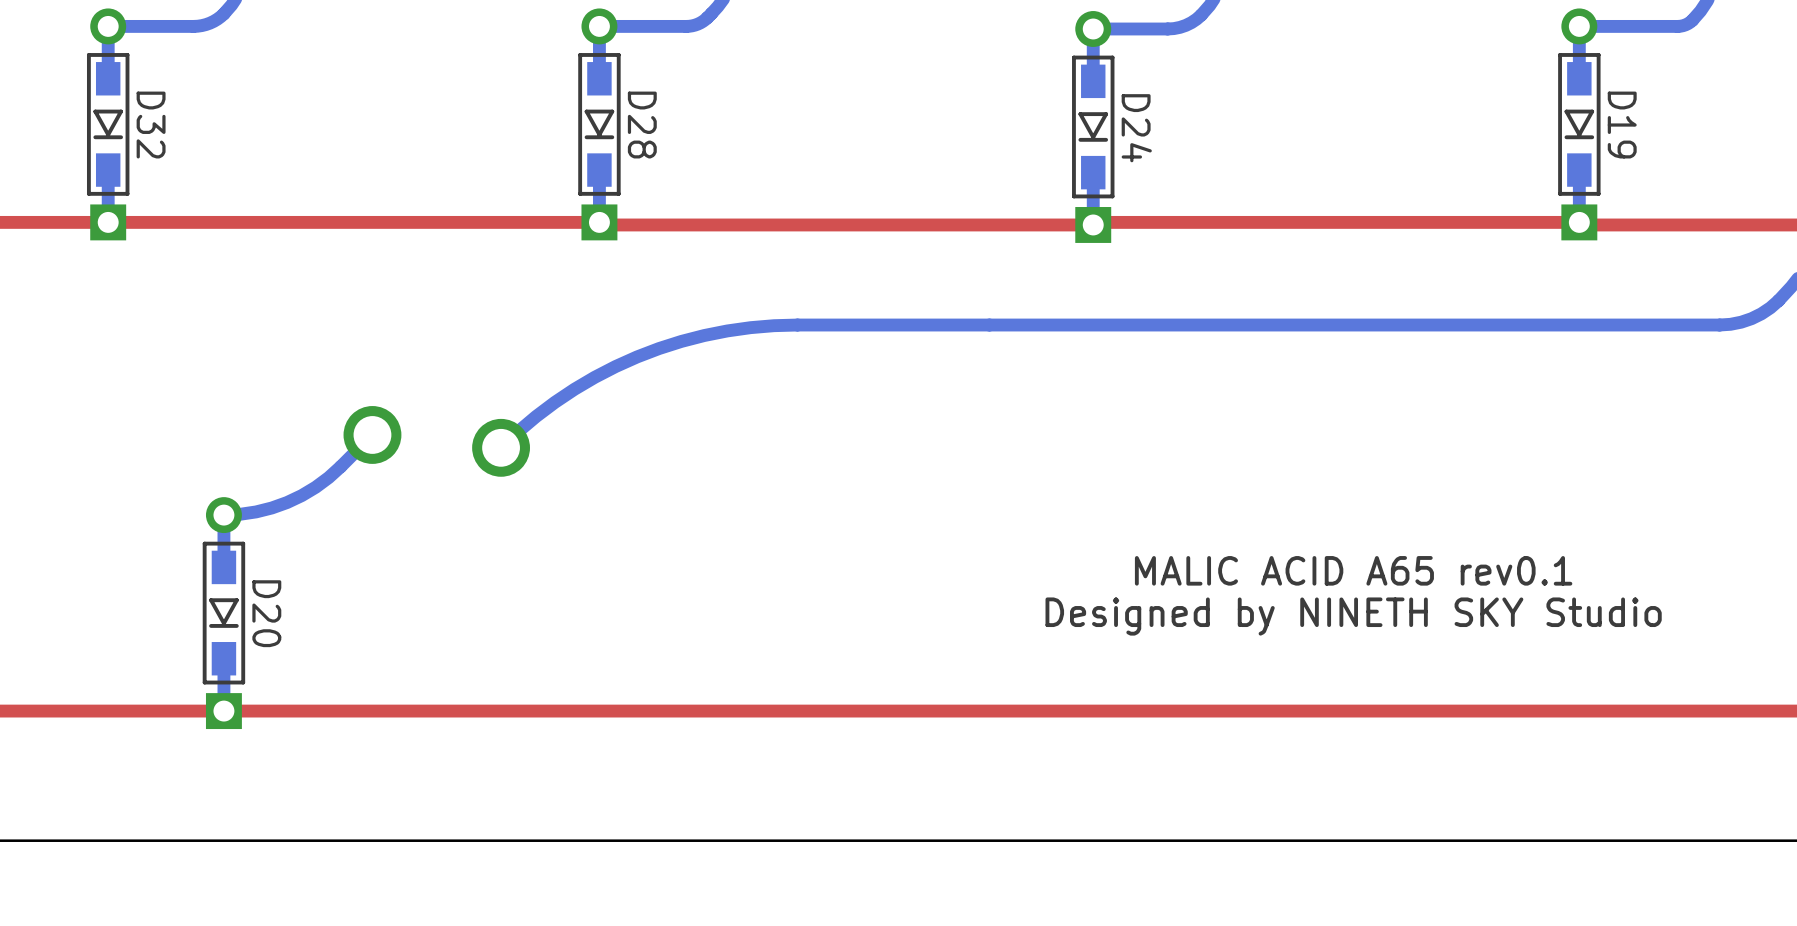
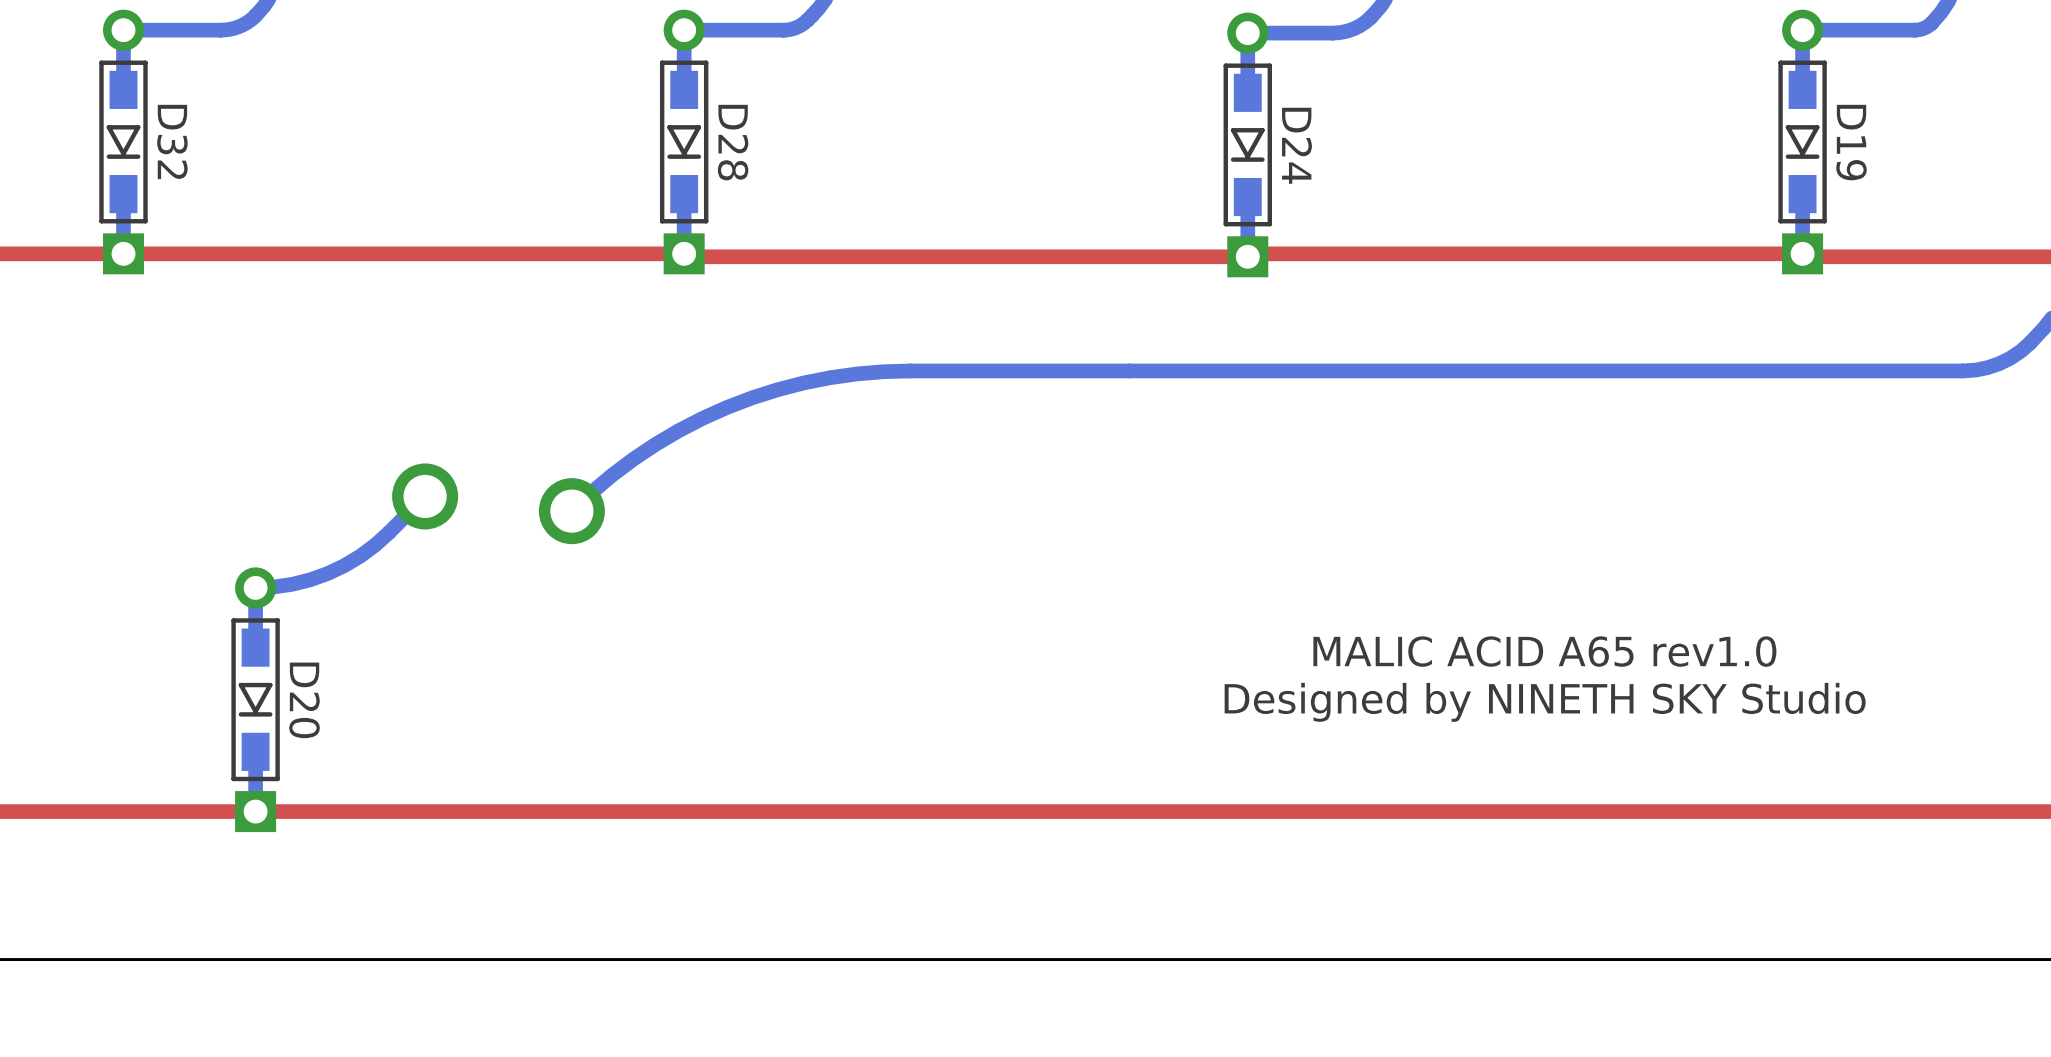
text: MALIC ACID A65 rev0.1 (1353, 570) -> MALIC ACID A65 rev1.0 (1544, 651)

